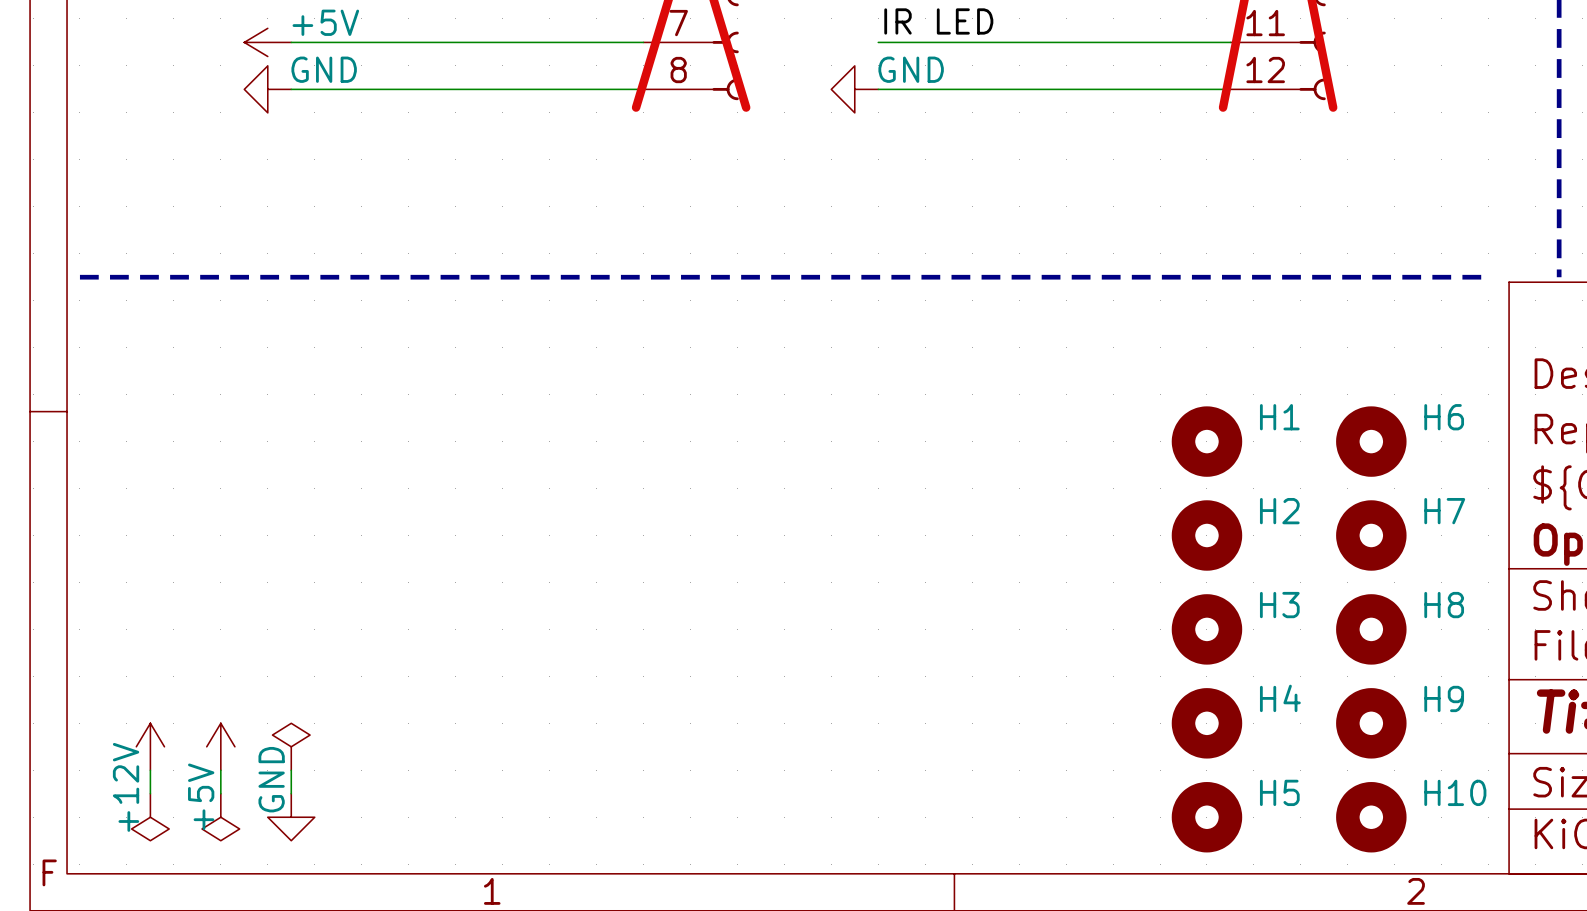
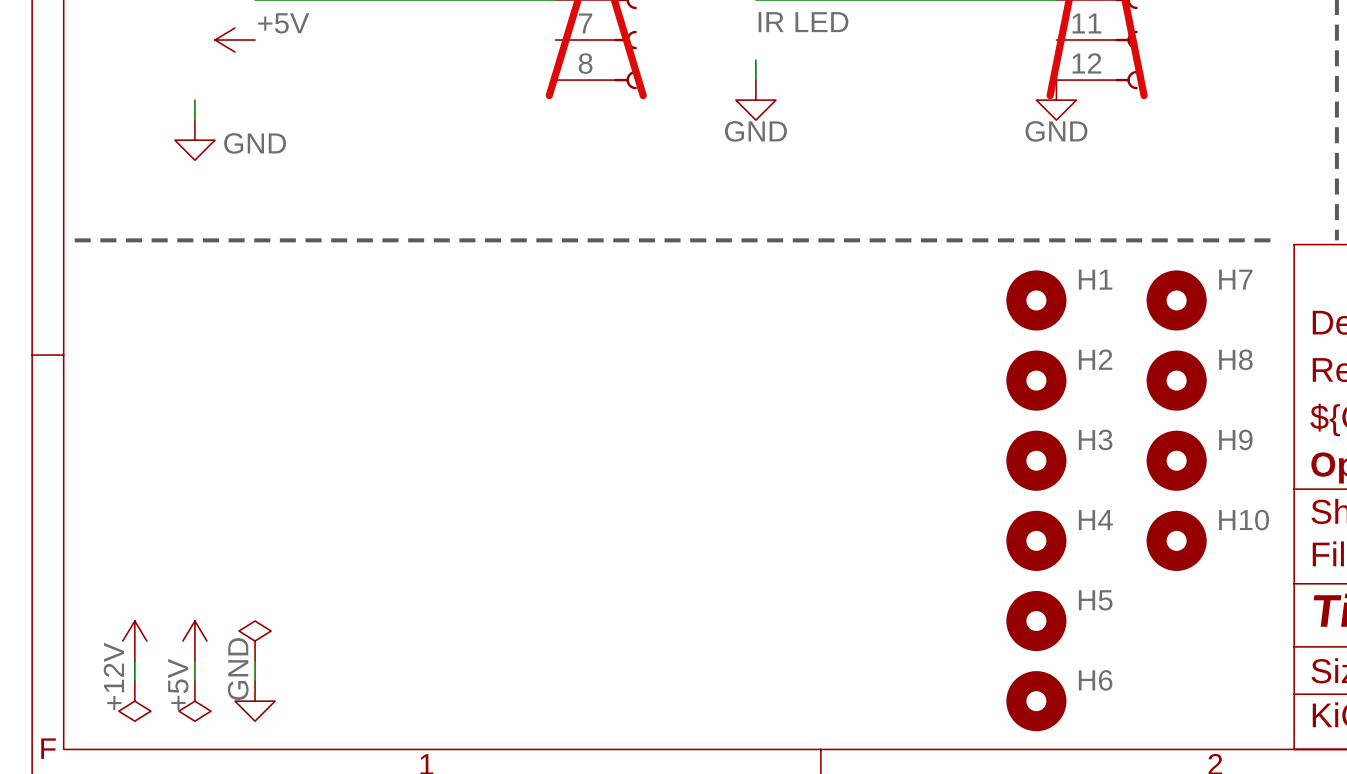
wire: (291, 42) (643, 42) -> none
wire: (878, 42) (1230, 42) -> none
power symbol text position: GND (911, 69) -> GND (755, 131)
power symbol rotation: 0° (267, 89) -> 90° counterclockwise (194, 140)
power symbol position: GND (267, 89) -> GND (194, 140)
wire: (291, 89) (643, 89) -> none
power symbol rotation: 0° (854, 89) -> 90° counterclockwise (755, 100)
power symbol position: GND (854, 89) -> GND (755, 100)
wire: (878, 89) (1230, 89) -> (755, 80) (755, 60)
wire: none -> (194, 100) (194, 120)
power symbol: none -> GND (1056, 100)
H1: none -> (1036, 300)
H7: none -> (1176, 300)
H1 name: H1 (1279, 417) -> H2 (1095, 359)
H6 name: H6 (1444, 417) -> H8 (1235, 359)
H2 name: H2 (1279, 511) -> H3 (1095, 439)
H7 name: H7 (1444, 511) -> H9 (1235, 439)
H3 name: H3 (1279, 605) -> H4 (1095, 520)
H8 name: H8 (1444, 605) -> H10 (1244, 520)
H4 name: H4 (1280, 698) -> H5 (1095, 600)
H9: (1371, 723) -> none
H5 name: H5 (1279, 792) -> H6 (1095, 680)
H10: (1371, 817) -> none

